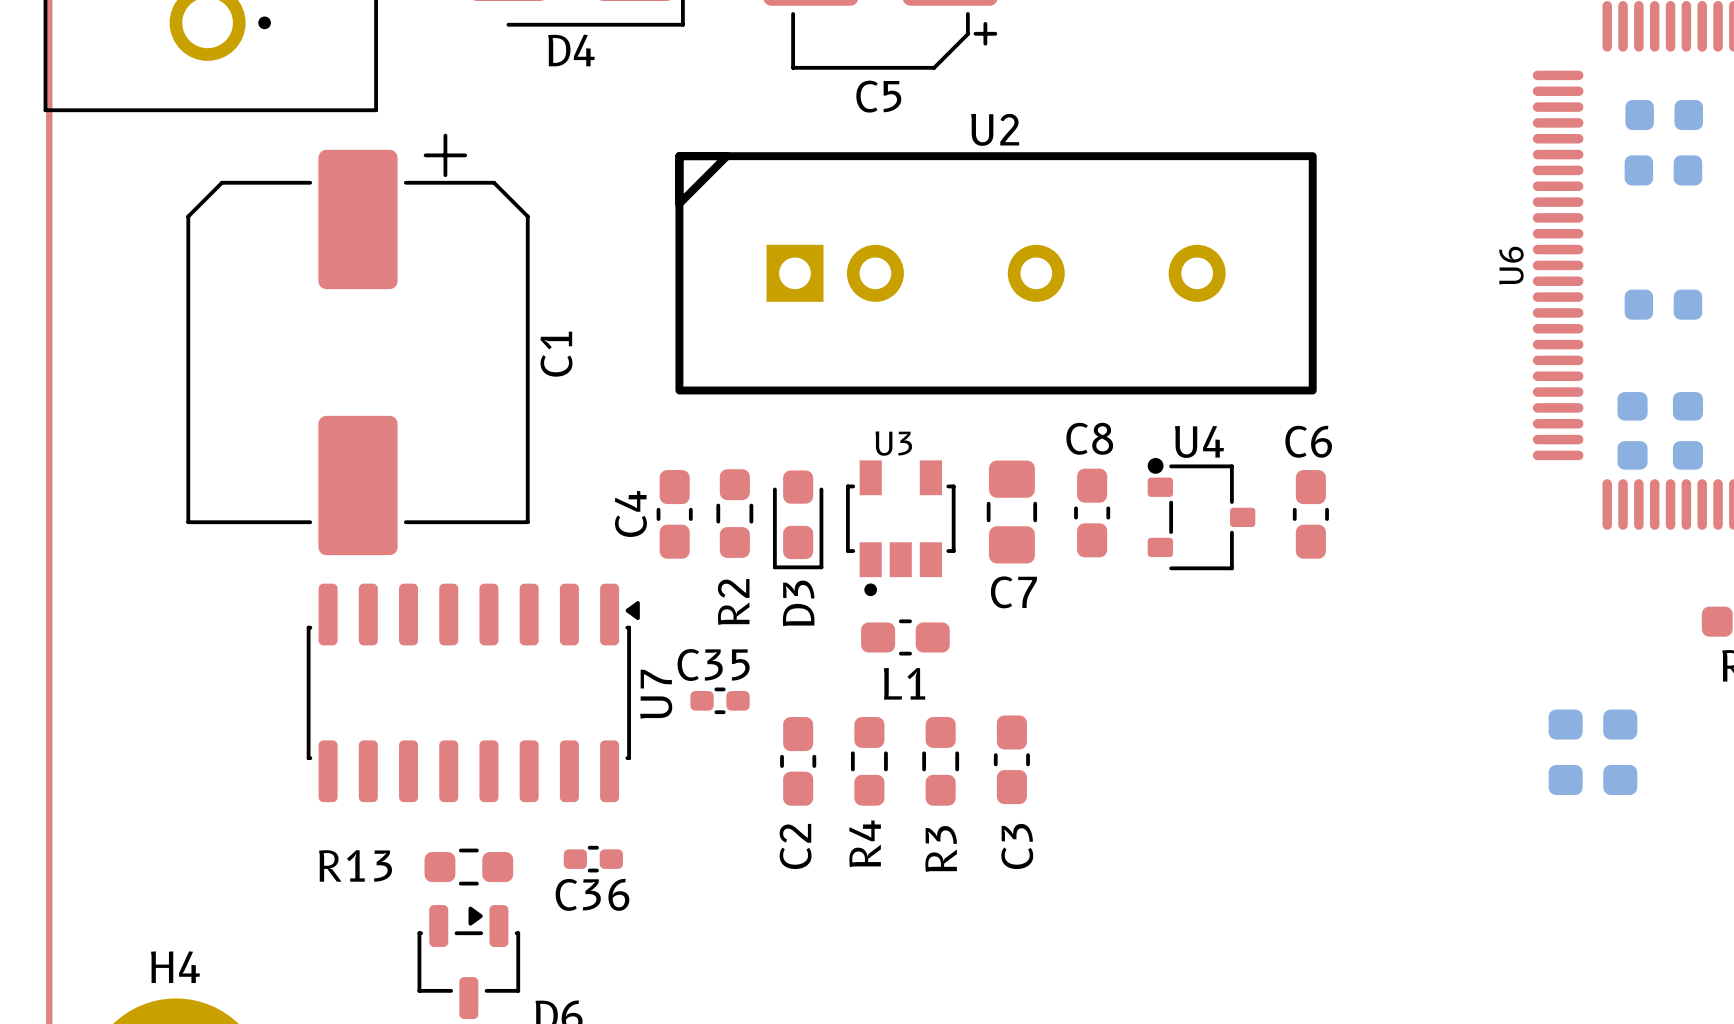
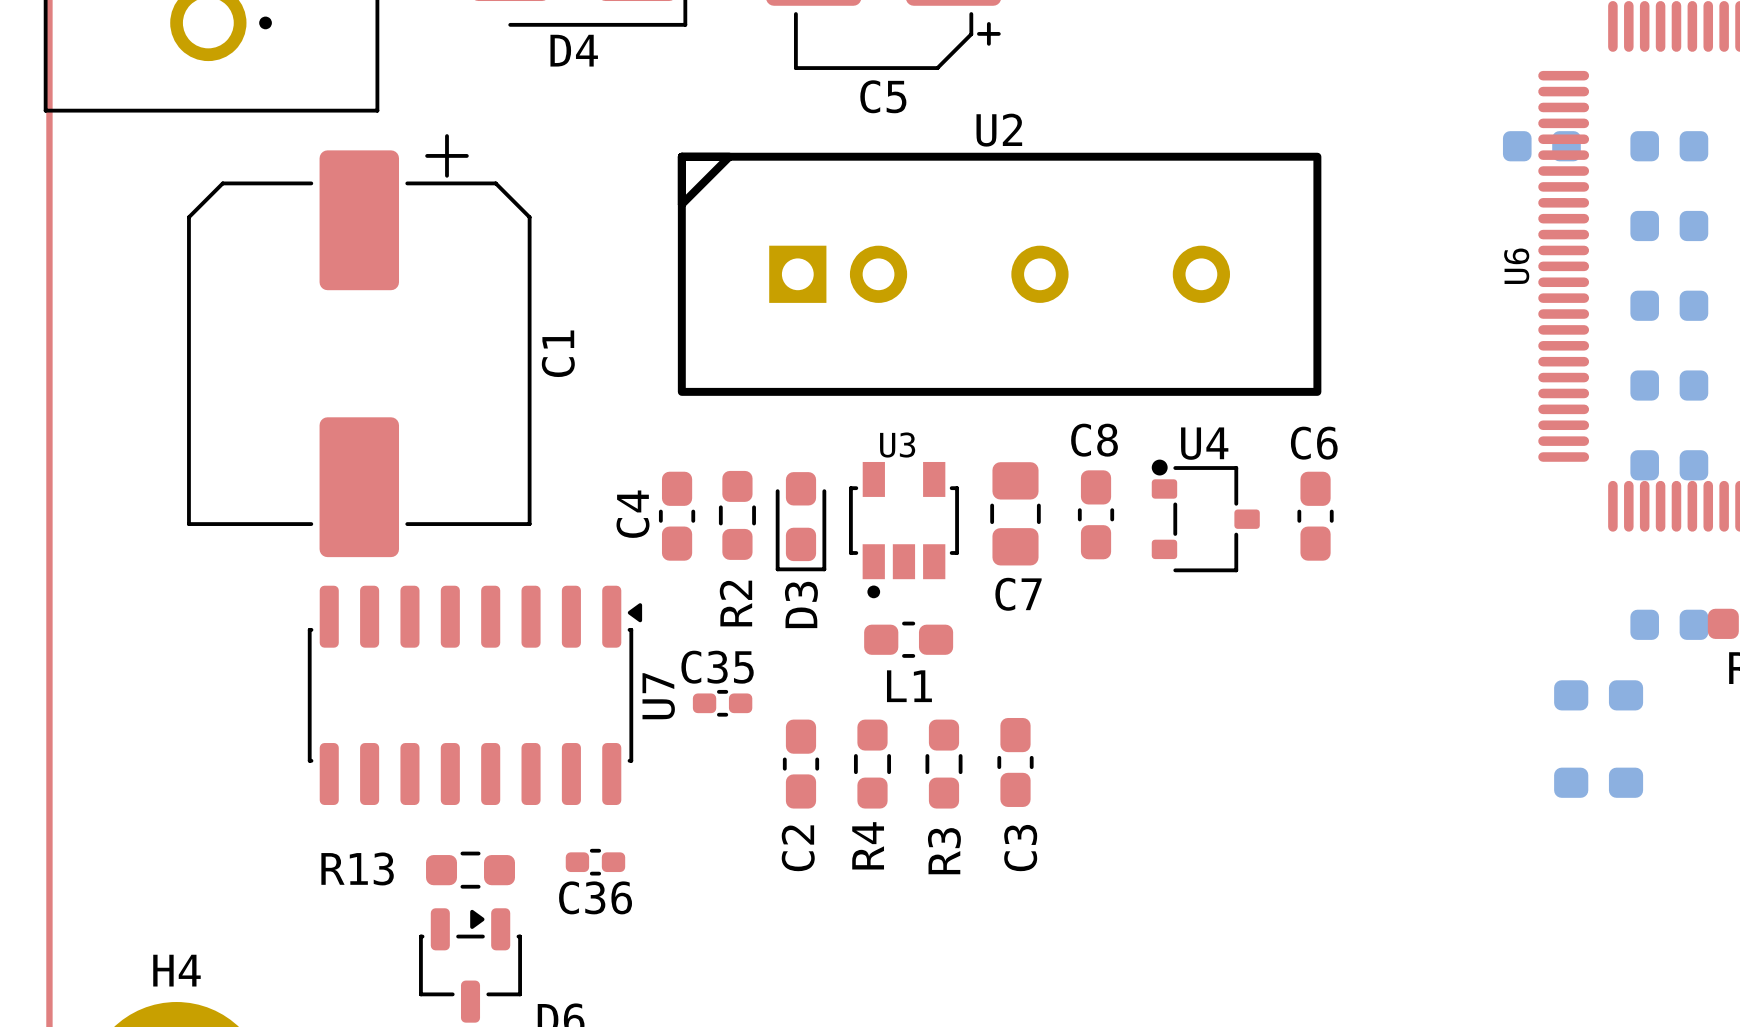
part: (1664, 115) -> none
part: none -> (1541, 146)
part: none -> (1669, 146)
part: (1663, 170) -> none
part: none -> (1669, 225)
part: none -> (1669, 385)
part: (1632, 430) -> none
part: (1687, 430) -> none
part: none -> (1669, 465)
part: none -> (1669, 624)
part position: (1592, 724) -> (1598, 695)

